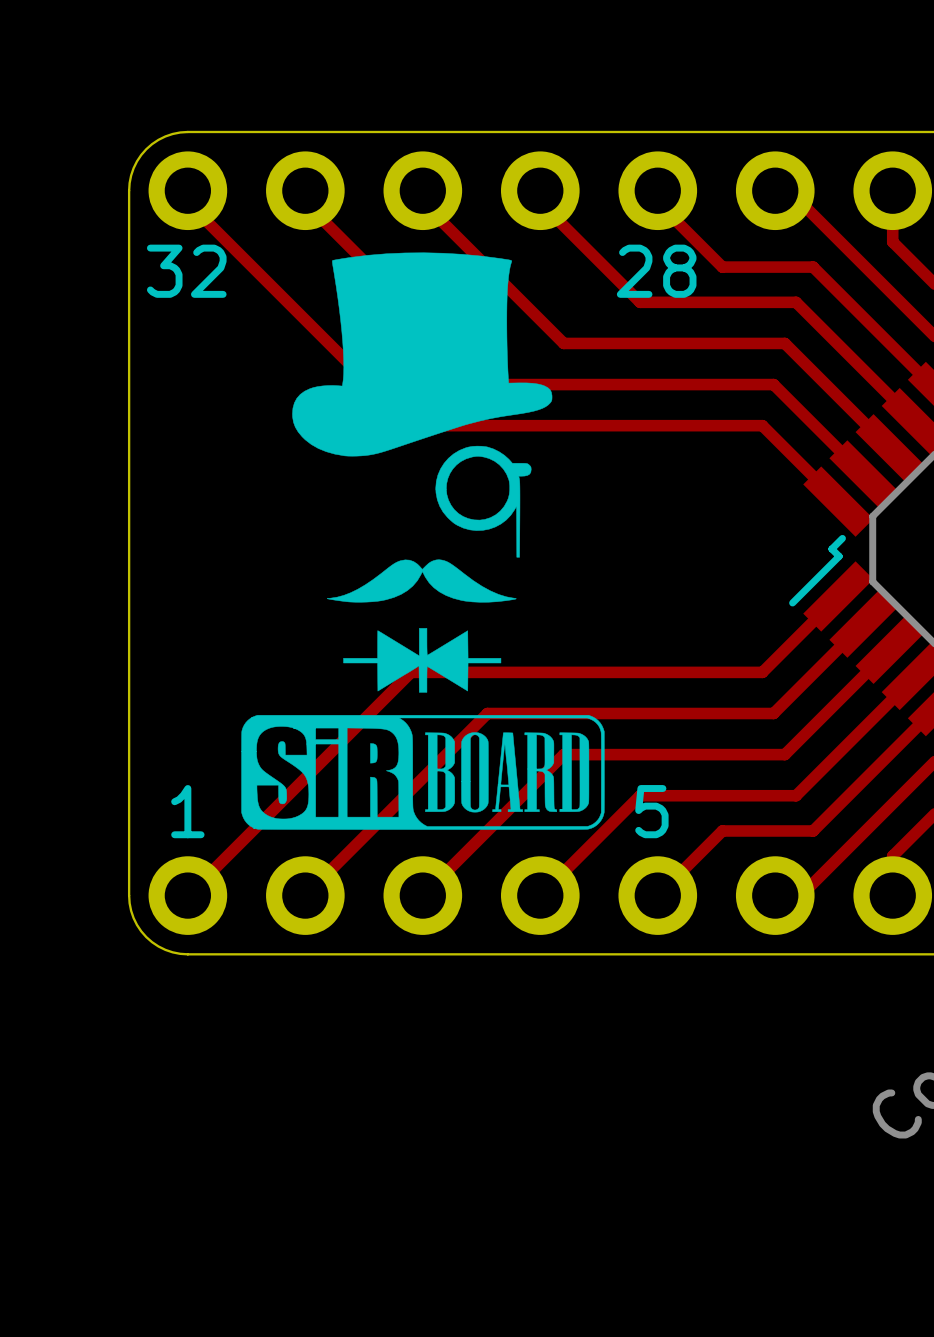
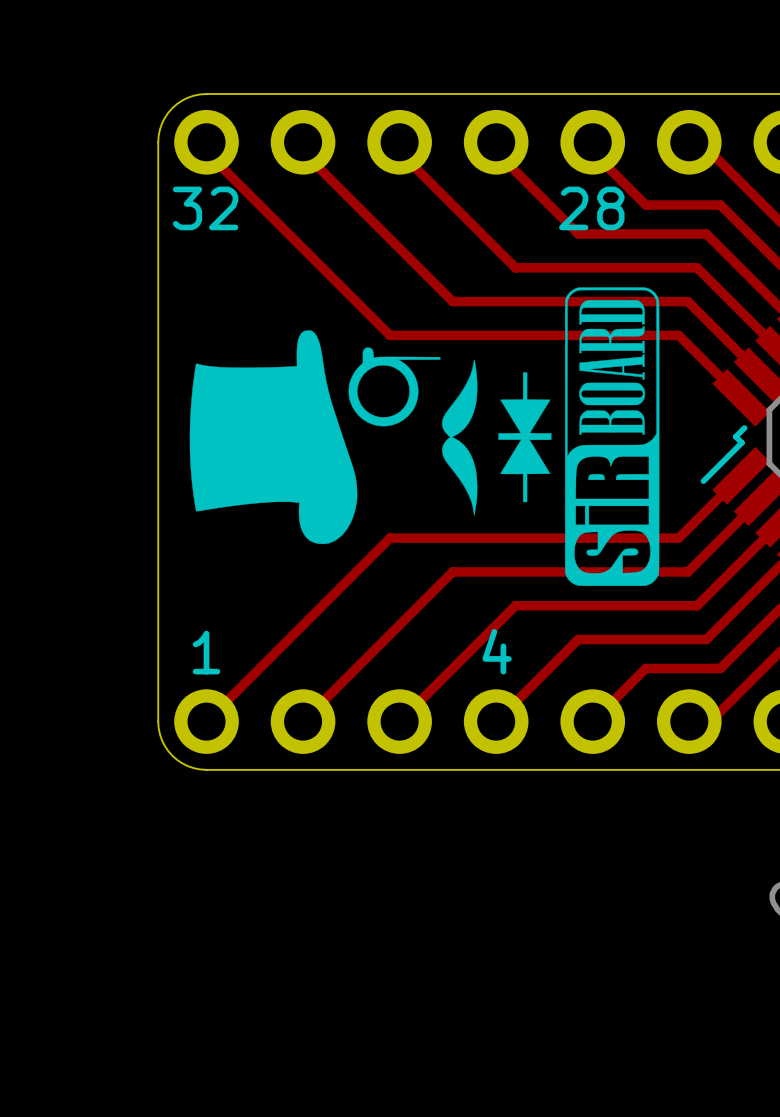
drawing: [241, 252, 605, 830] -> none
drawing: none -> [189, 287, 660, 586]
text: none -> 4 (497, 651)
text: 5 (651, 811) -> none

